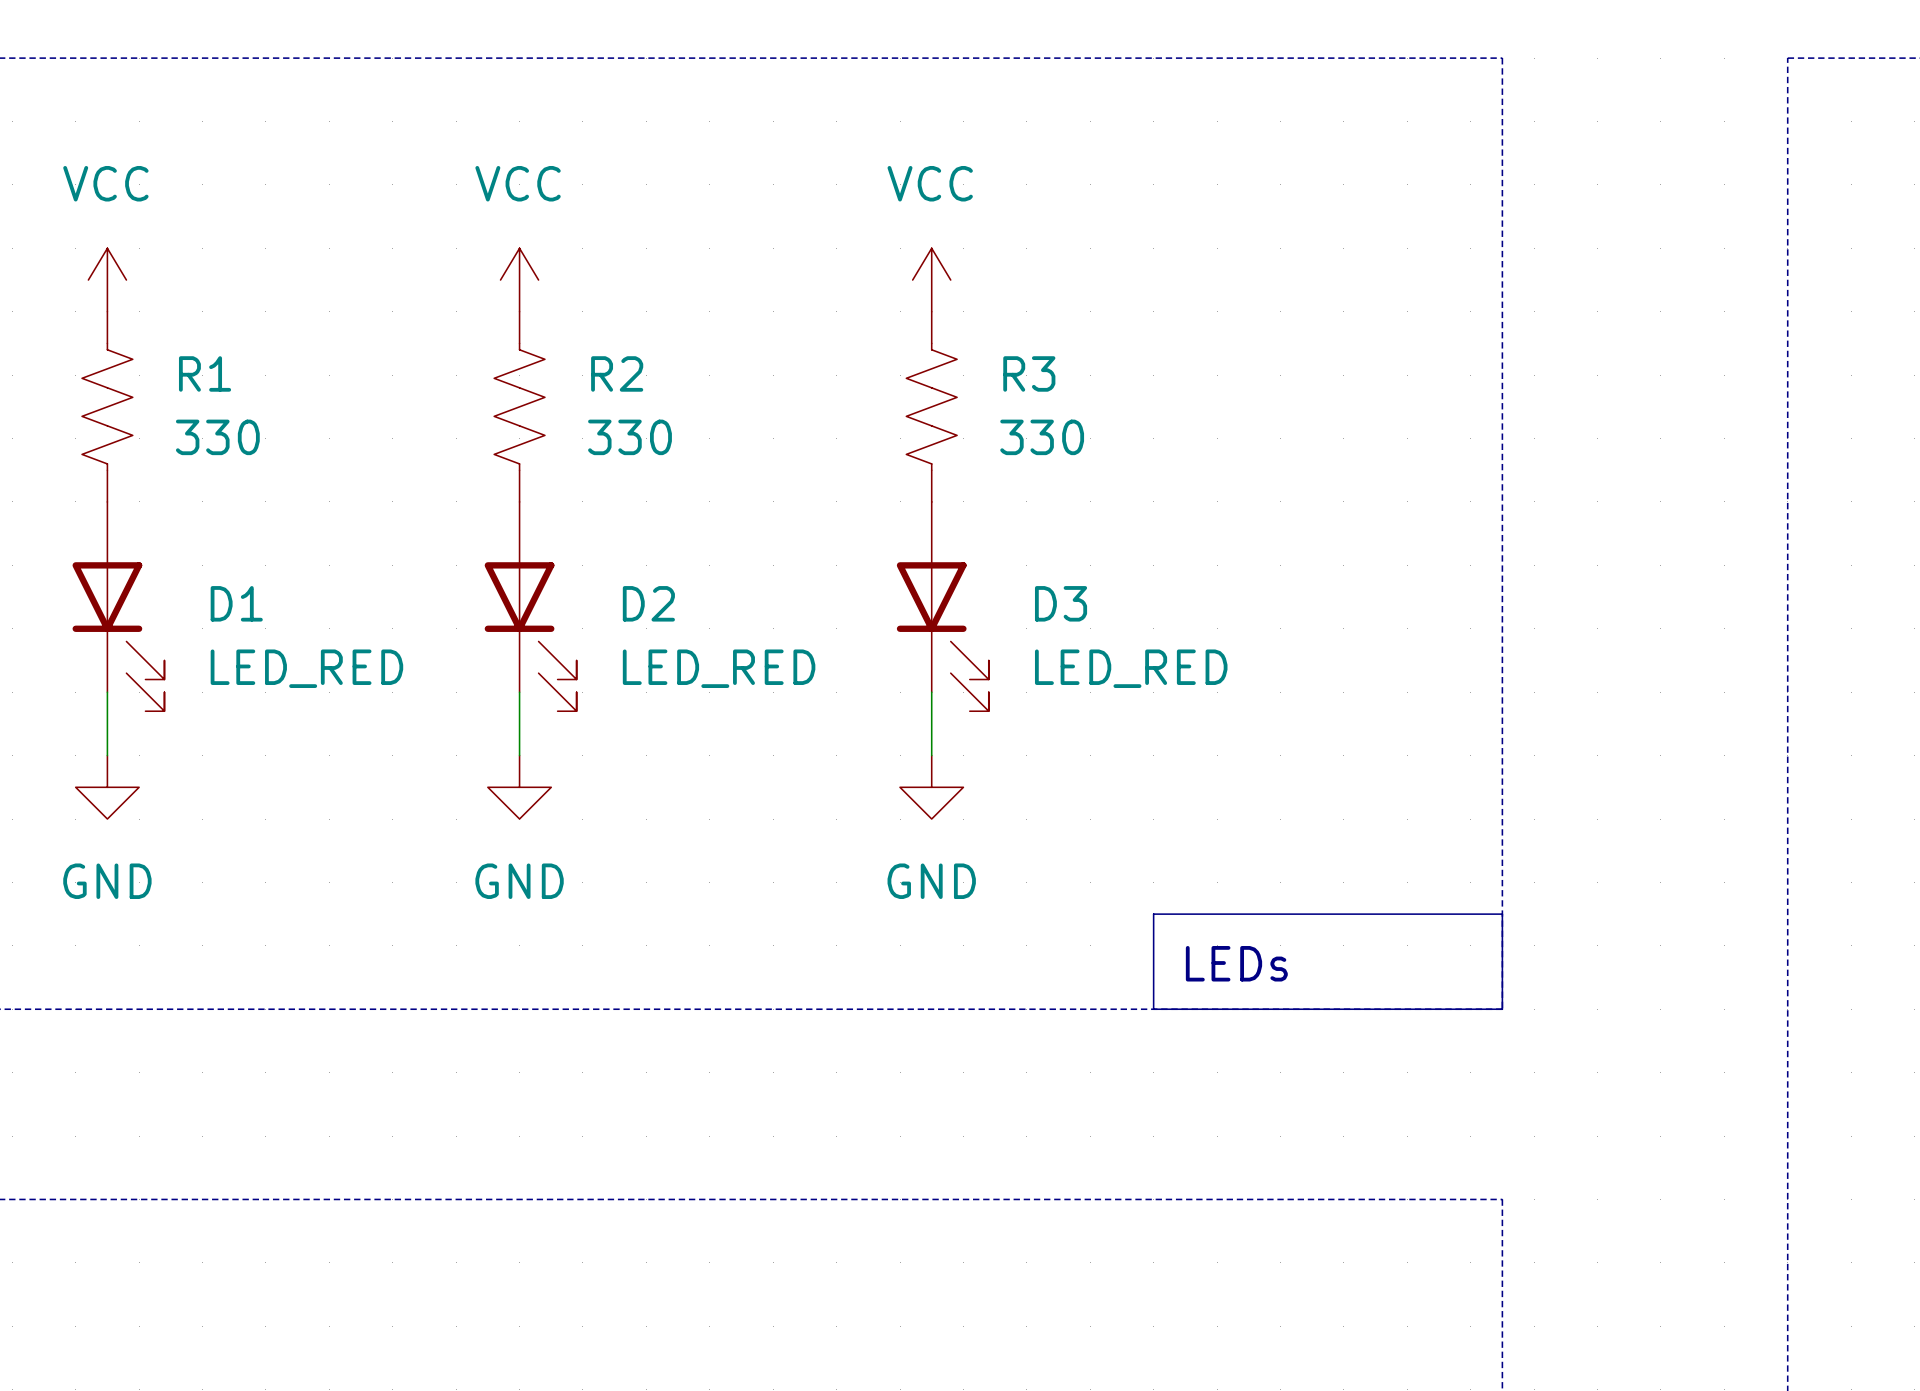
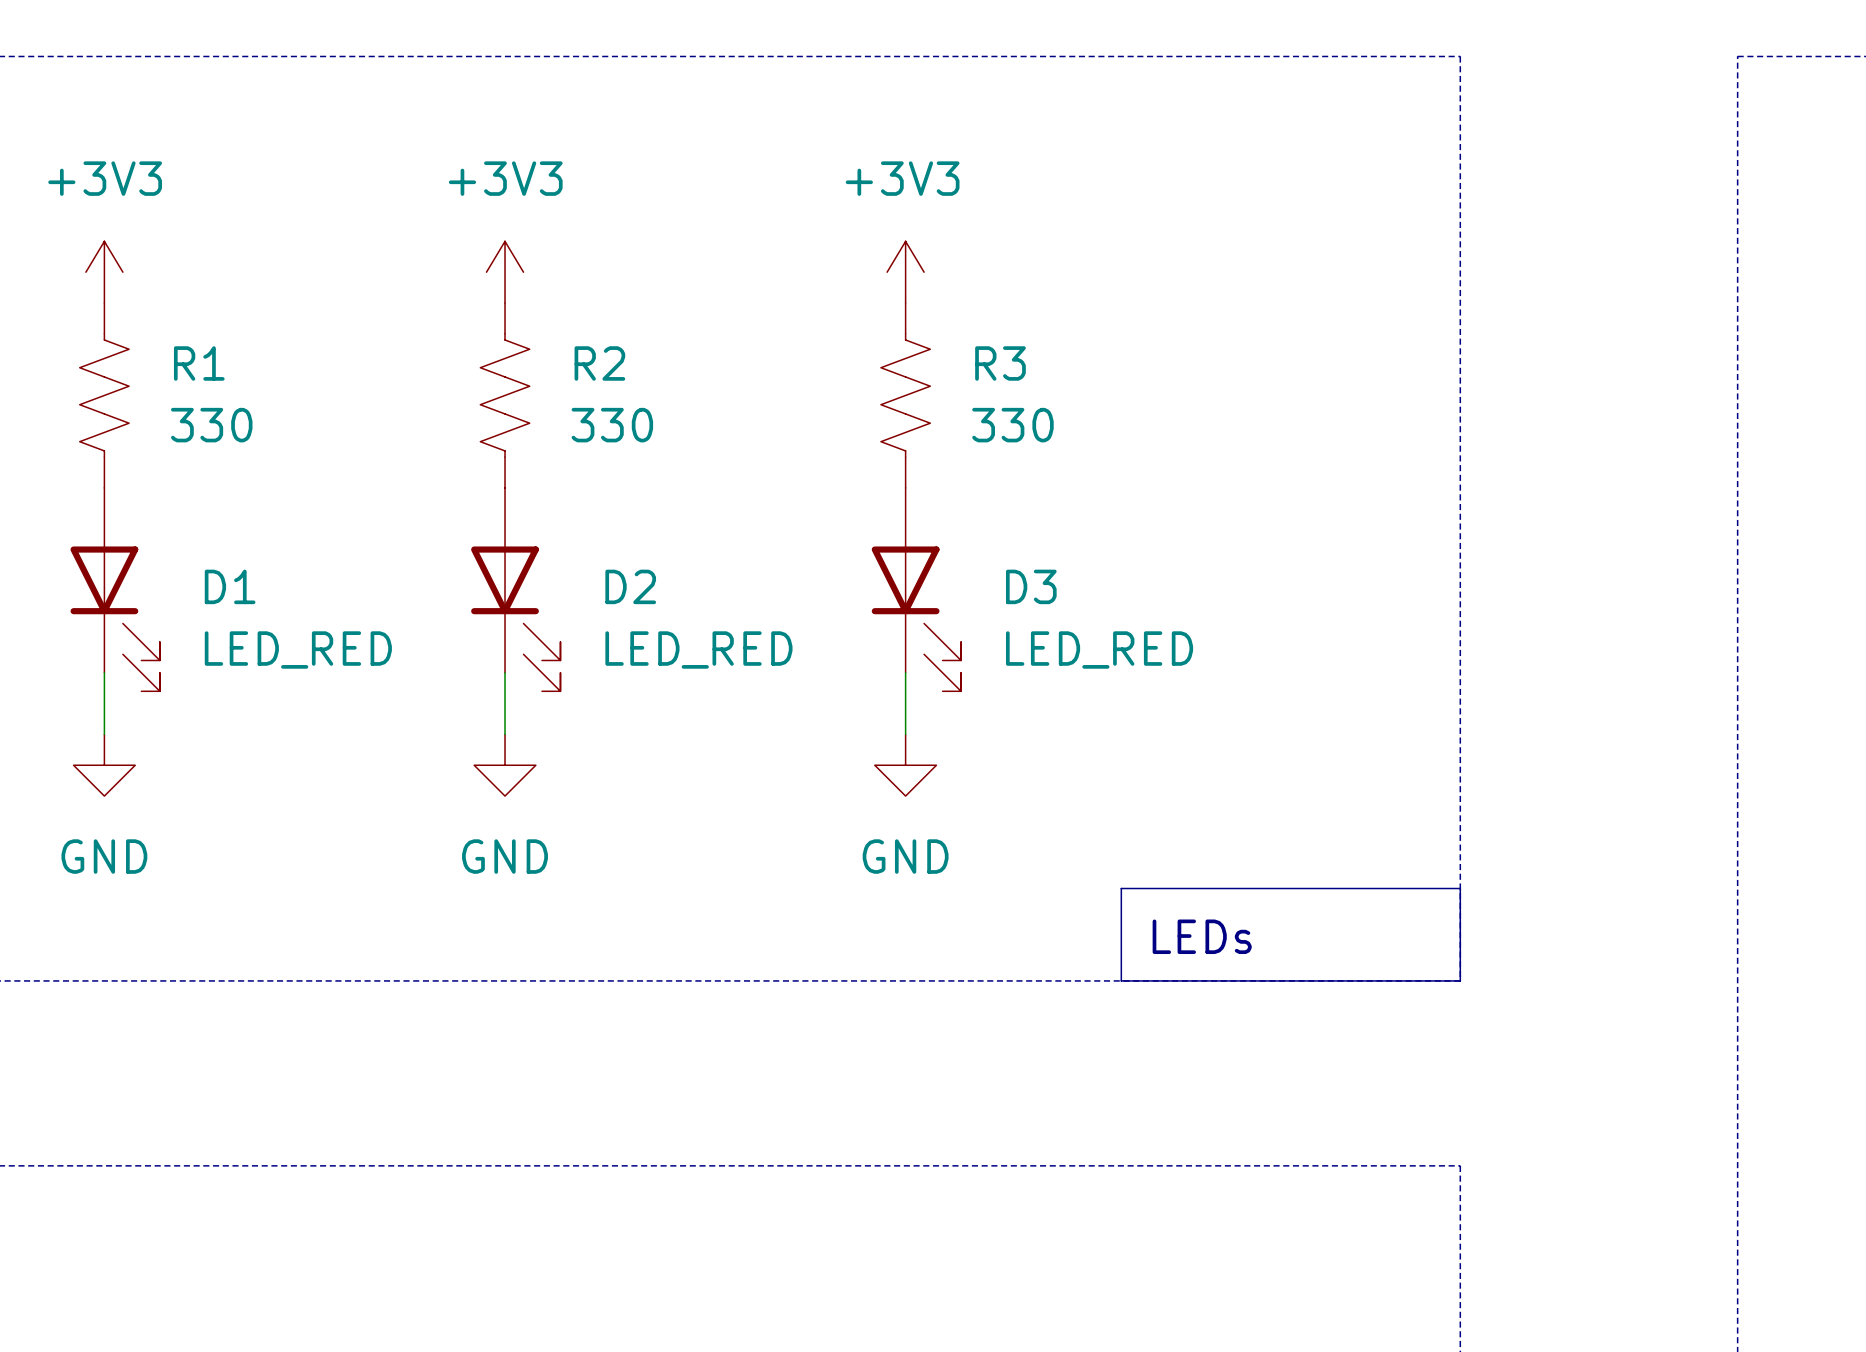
power symbol: VCC (107, 280) -> +3V3 (104, 272)
power symbol: VCC (519, 280) -> +3V3 (505, 272)
power symbol: VCC (931, 280) -> +3V3 (905, 272)

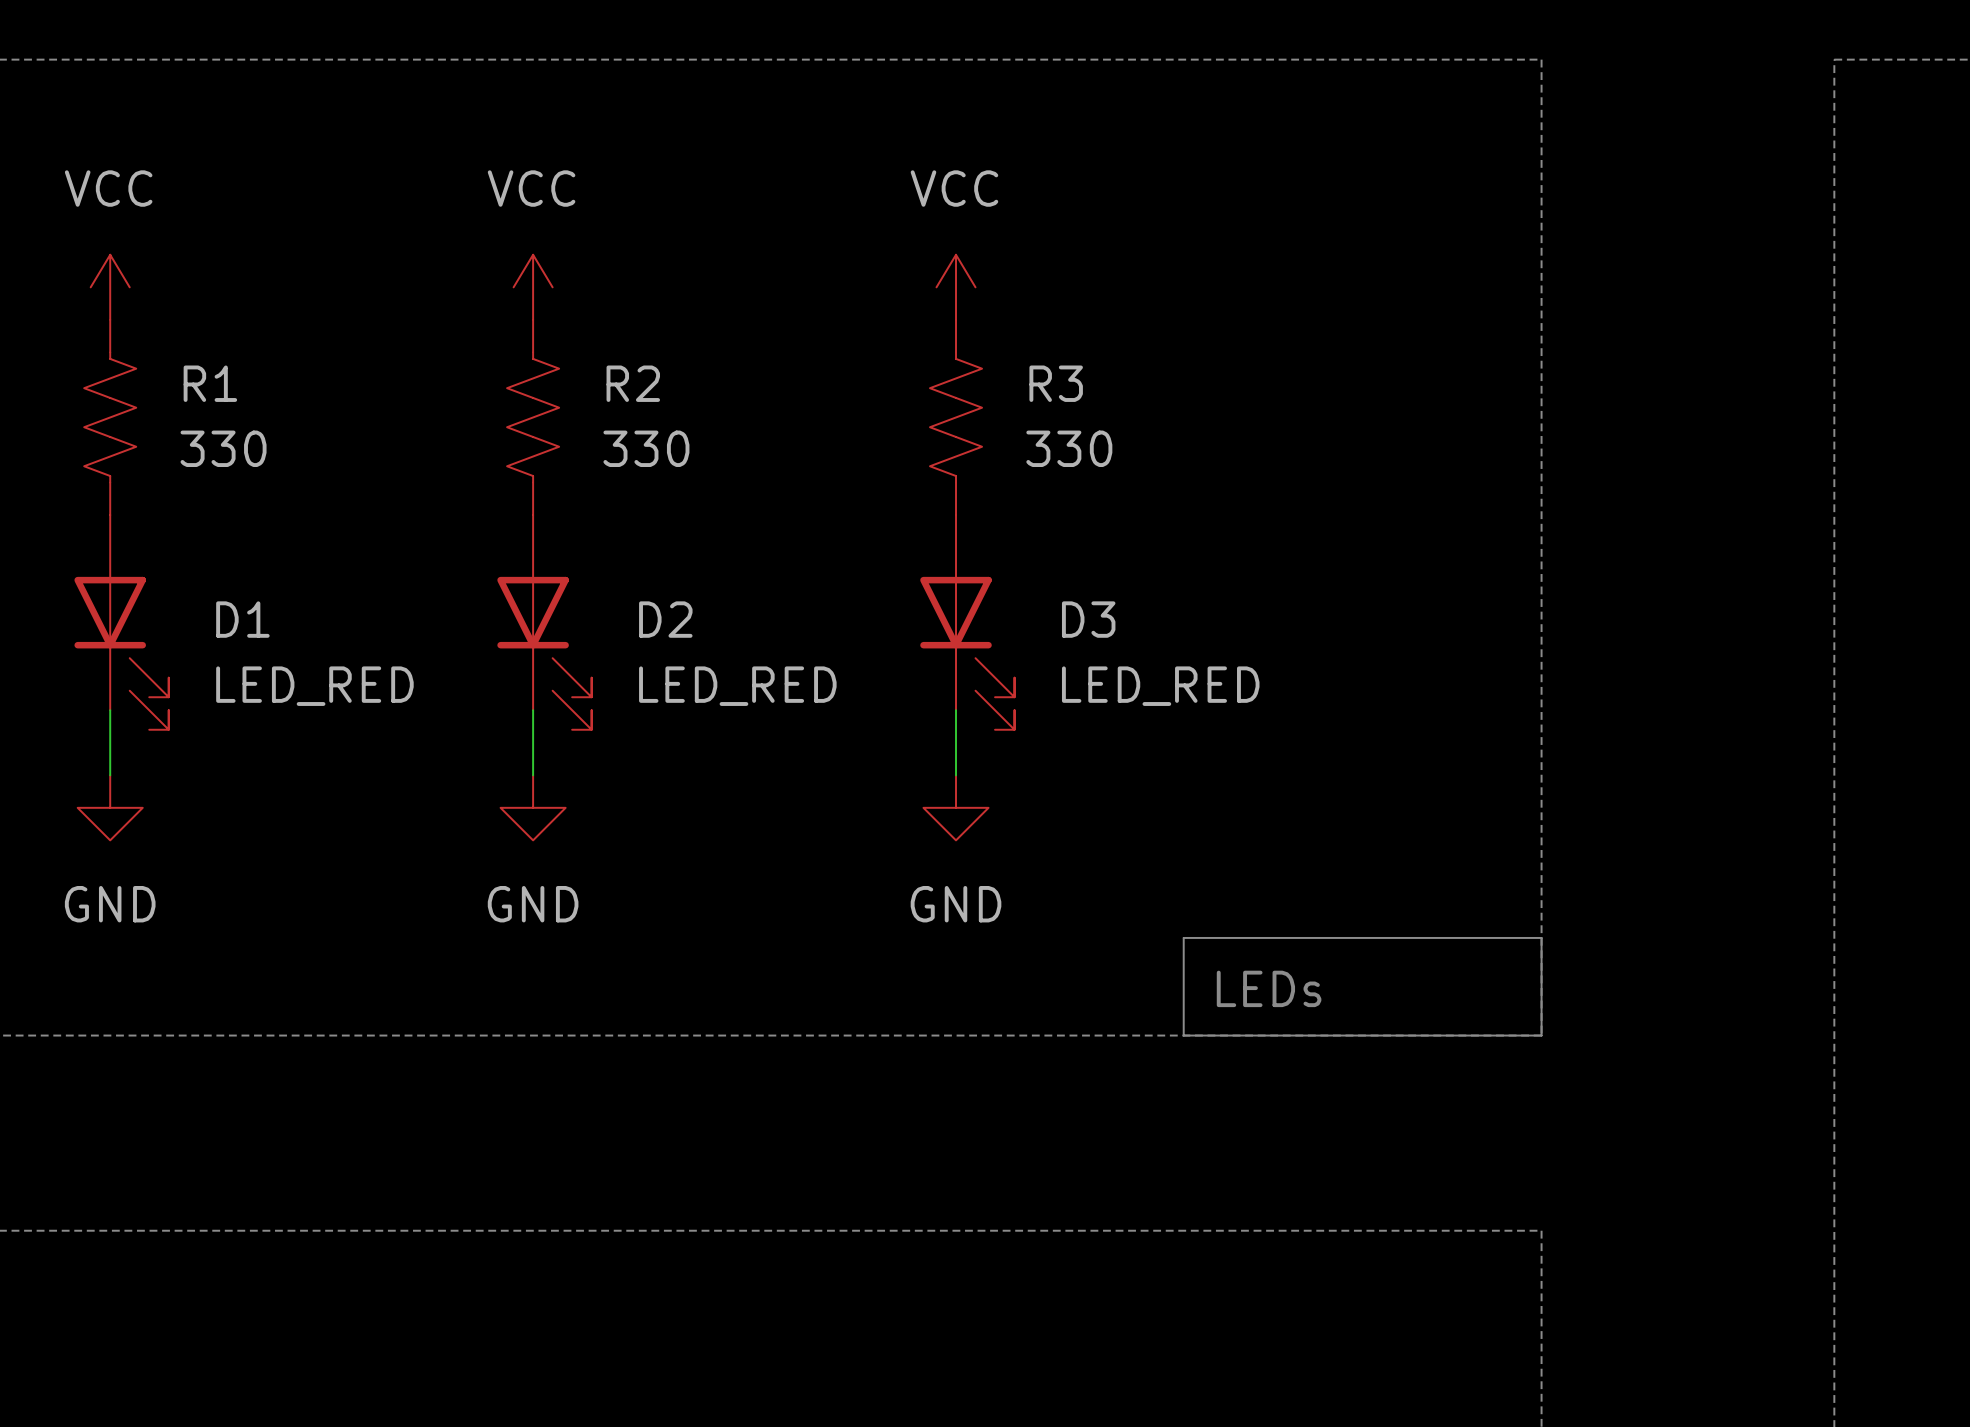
power symbol: +3V3 (104, 272) -> VCC (110, 287)
power symbol: +3V3 (505, 272) -> VCC (533, 287)
power symbol: +3V3 (905, 272) -> VCC (956, 287)

